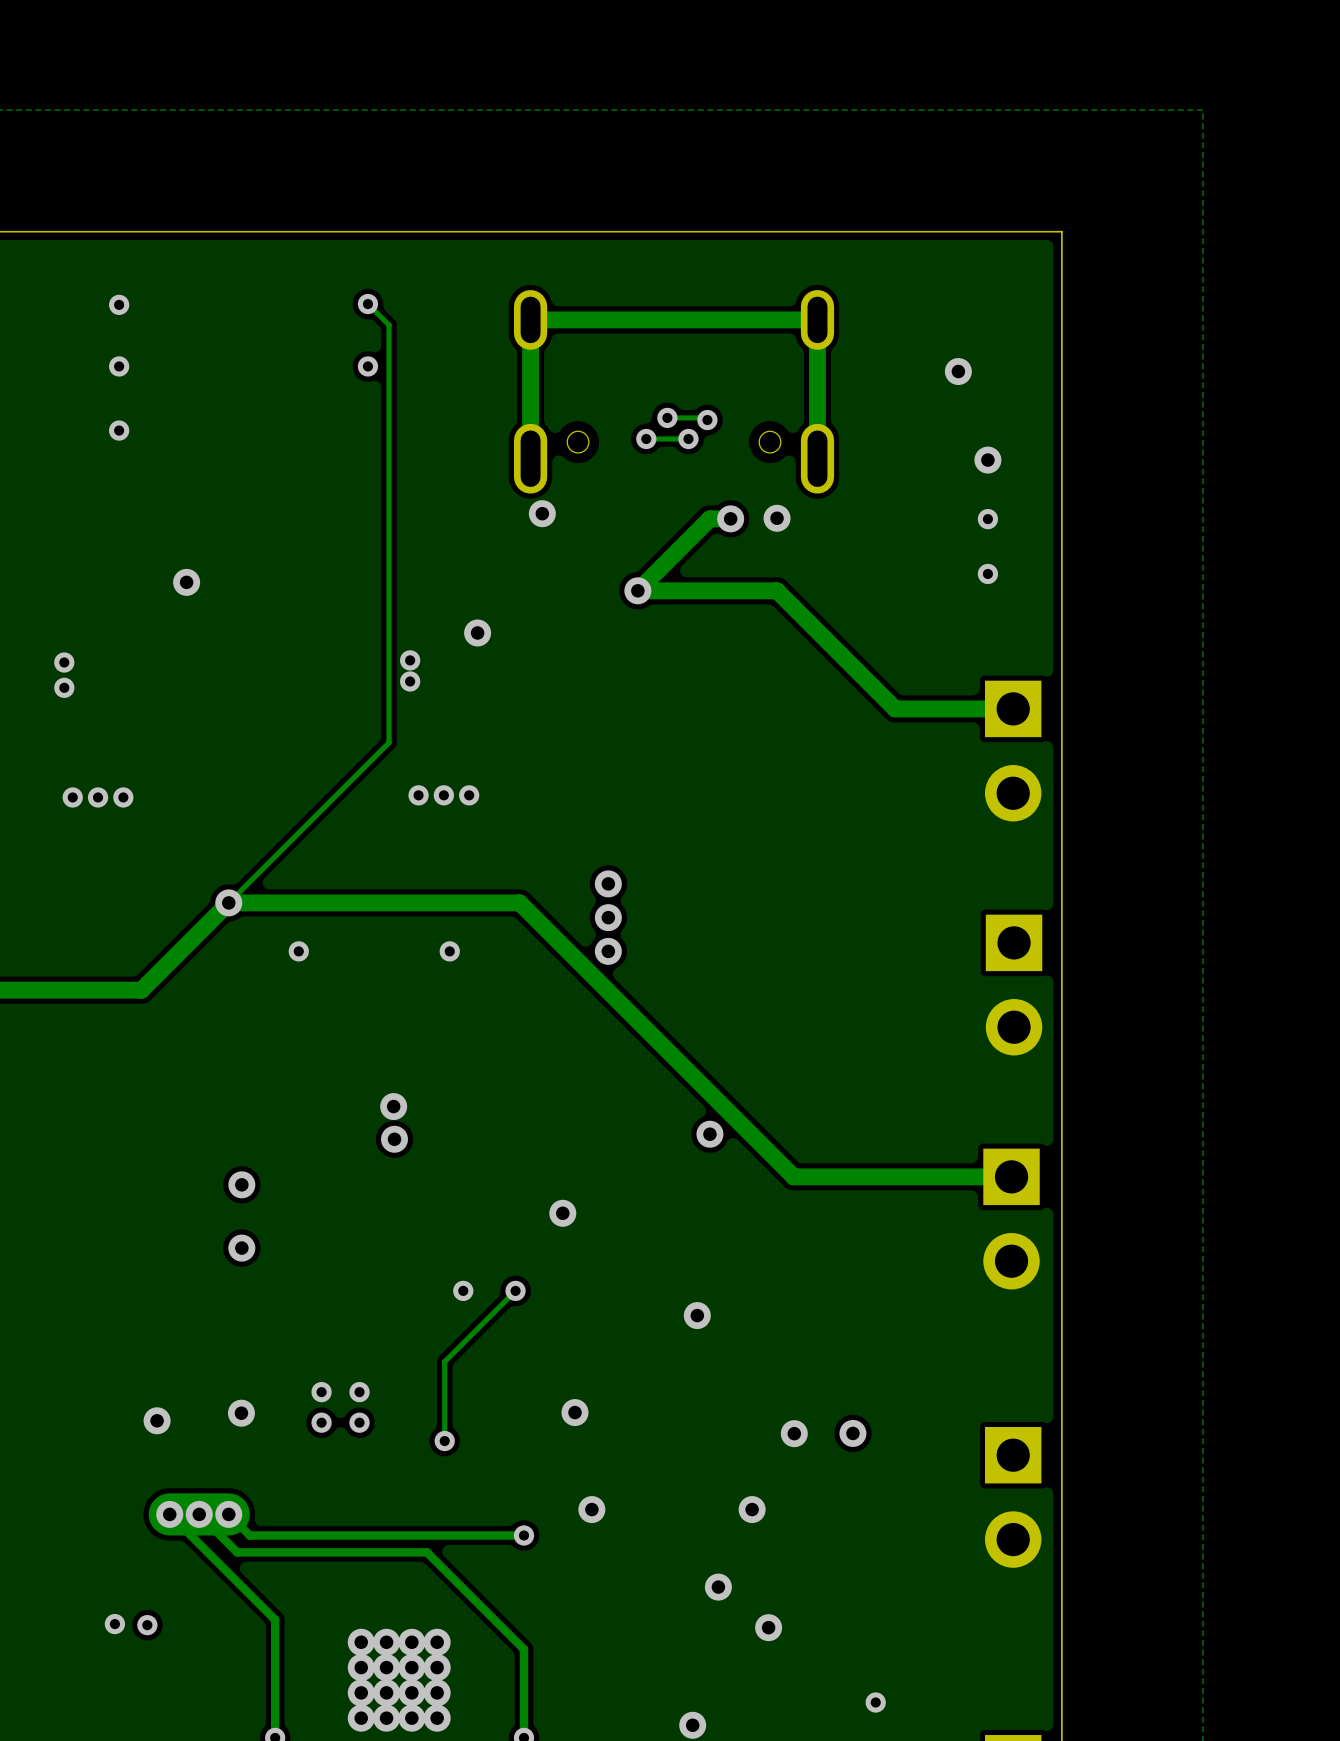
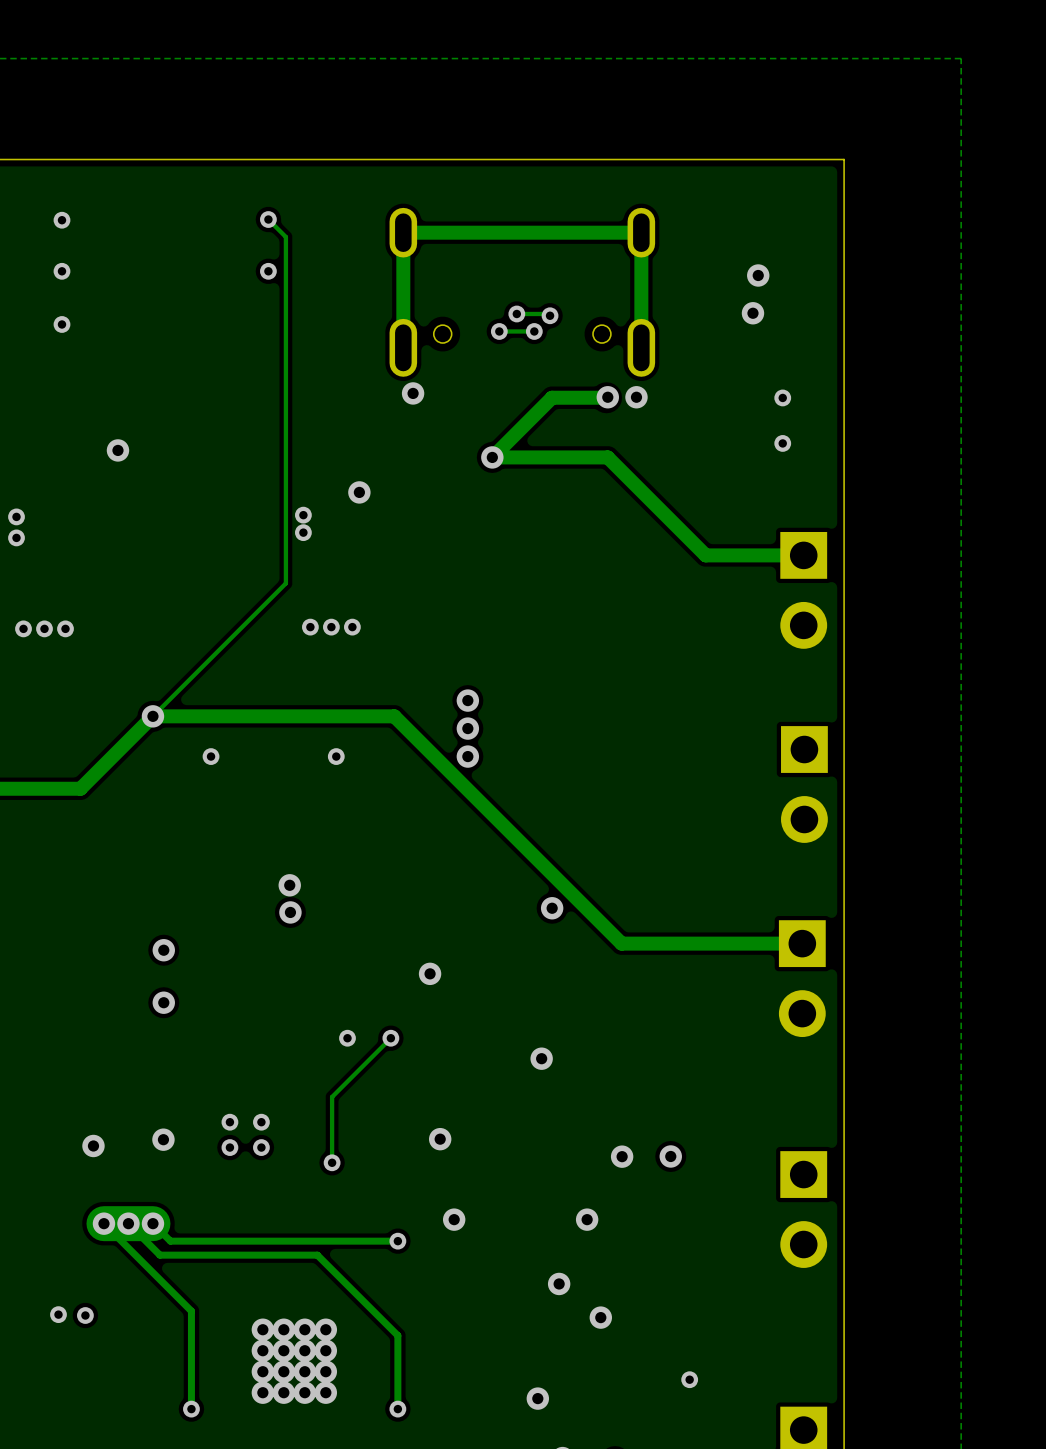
via position: (987, 460) -> (752, 313)
via position: (730, 518) -> (636, 397)
track: none -> (606, 397) (569, 397)

